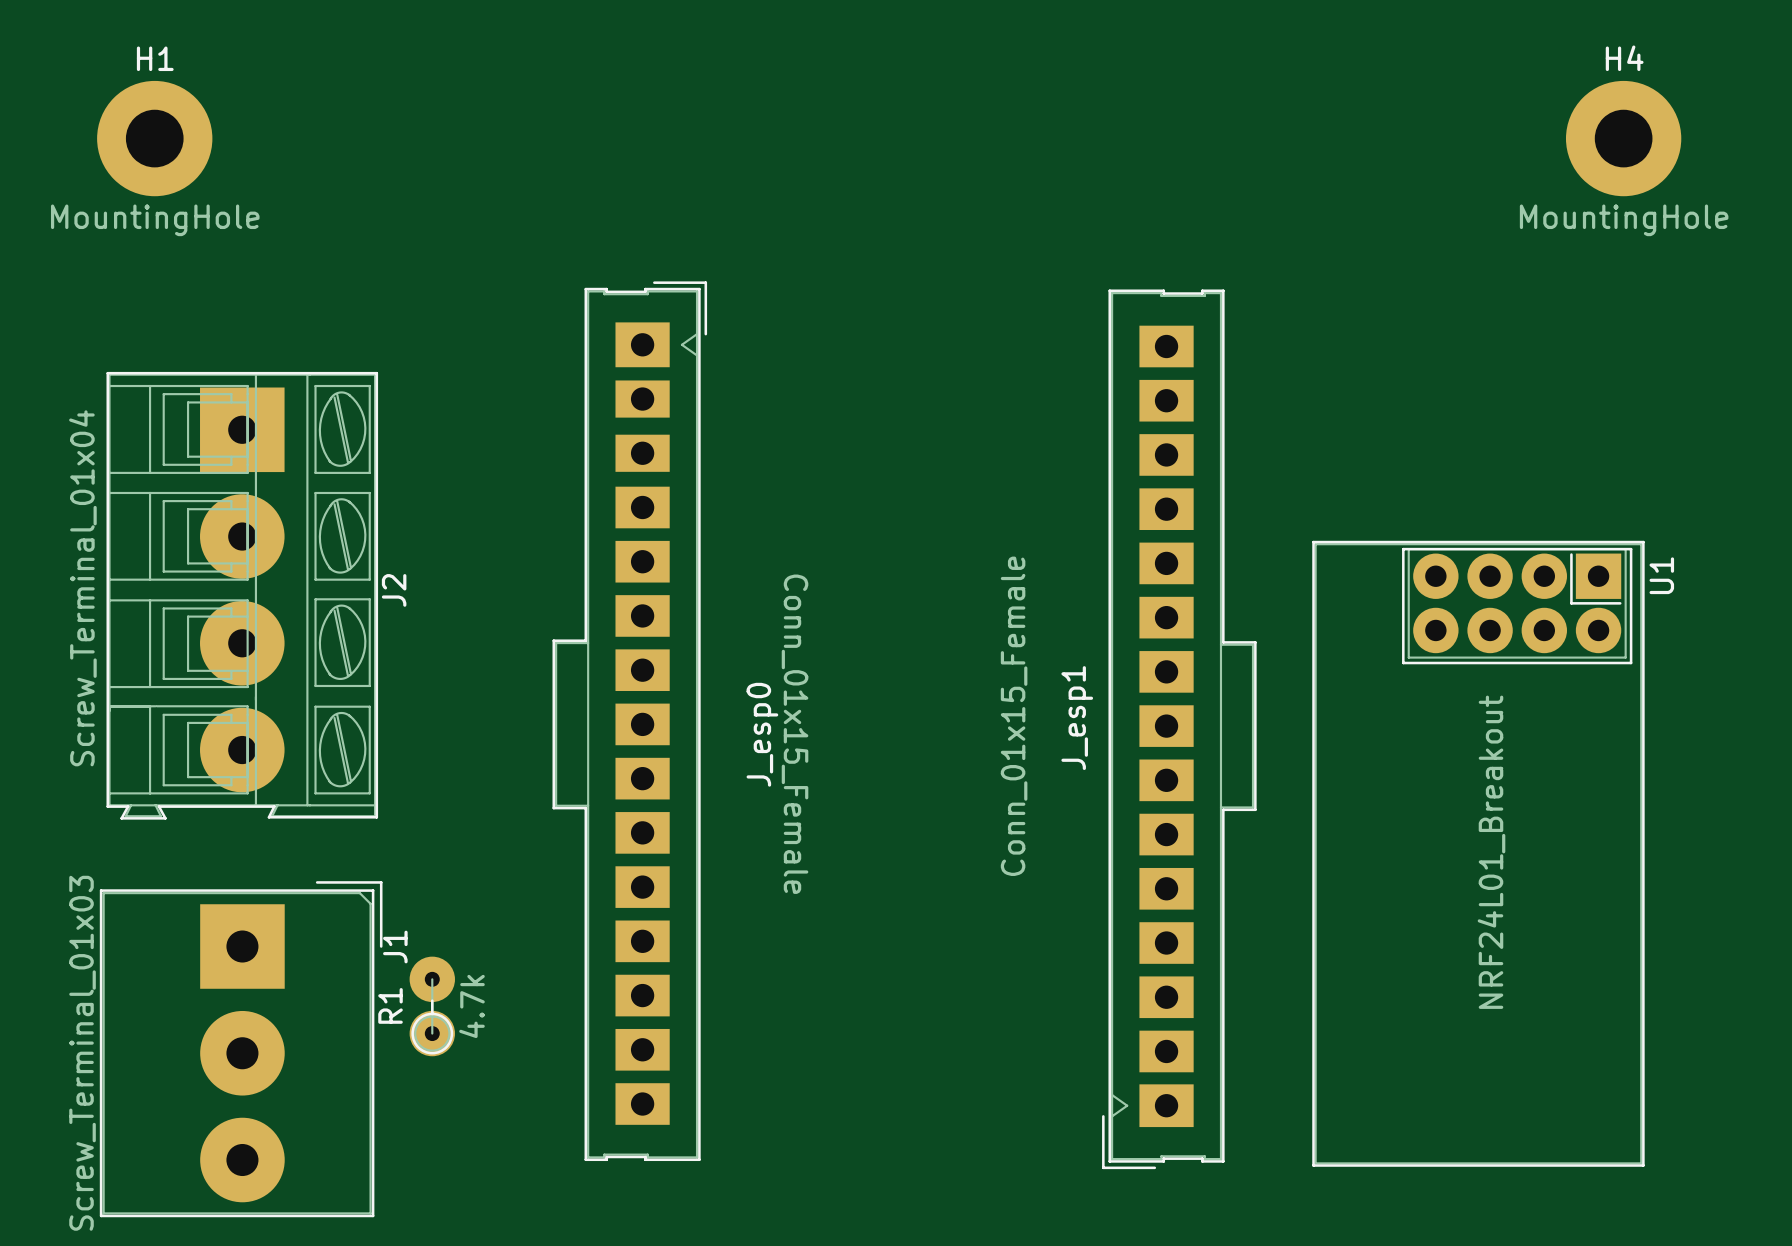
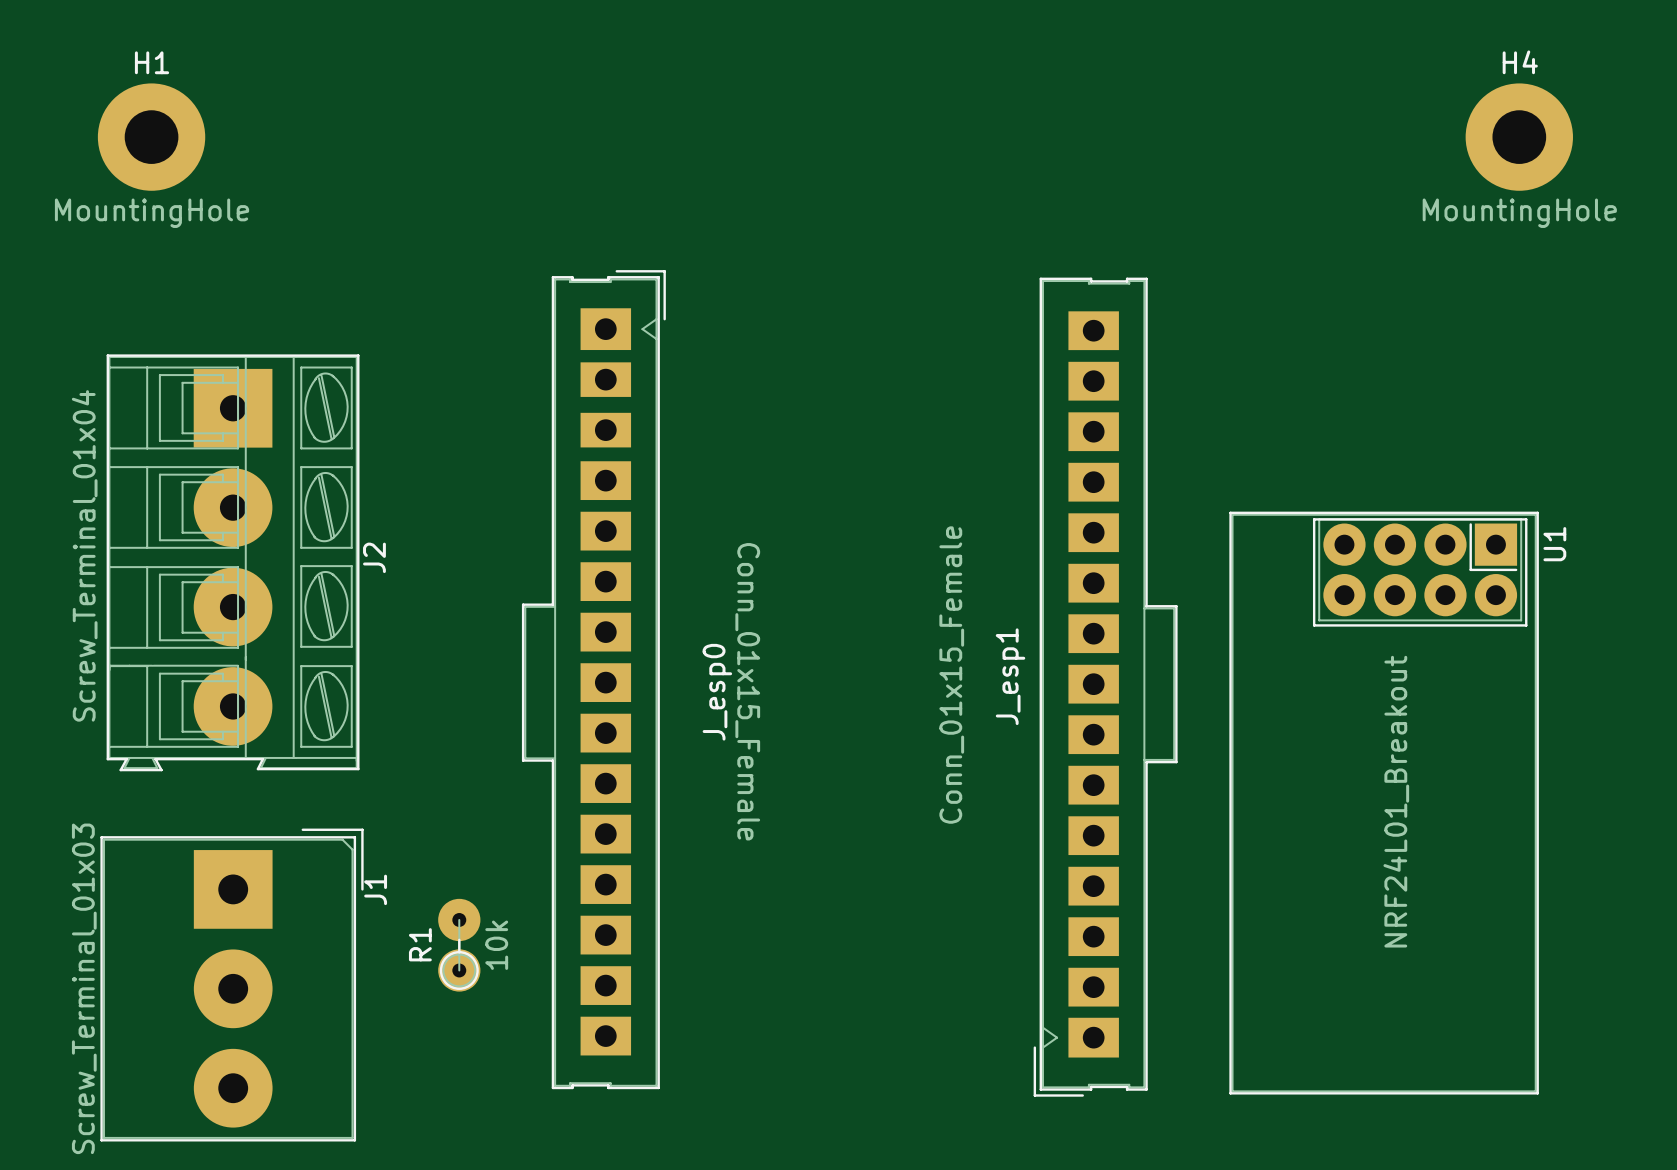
R1 position: (432, 1006) -> (459, 945)
R1 value: 4.7k (471, 1006) -> 10k (496, 945)

